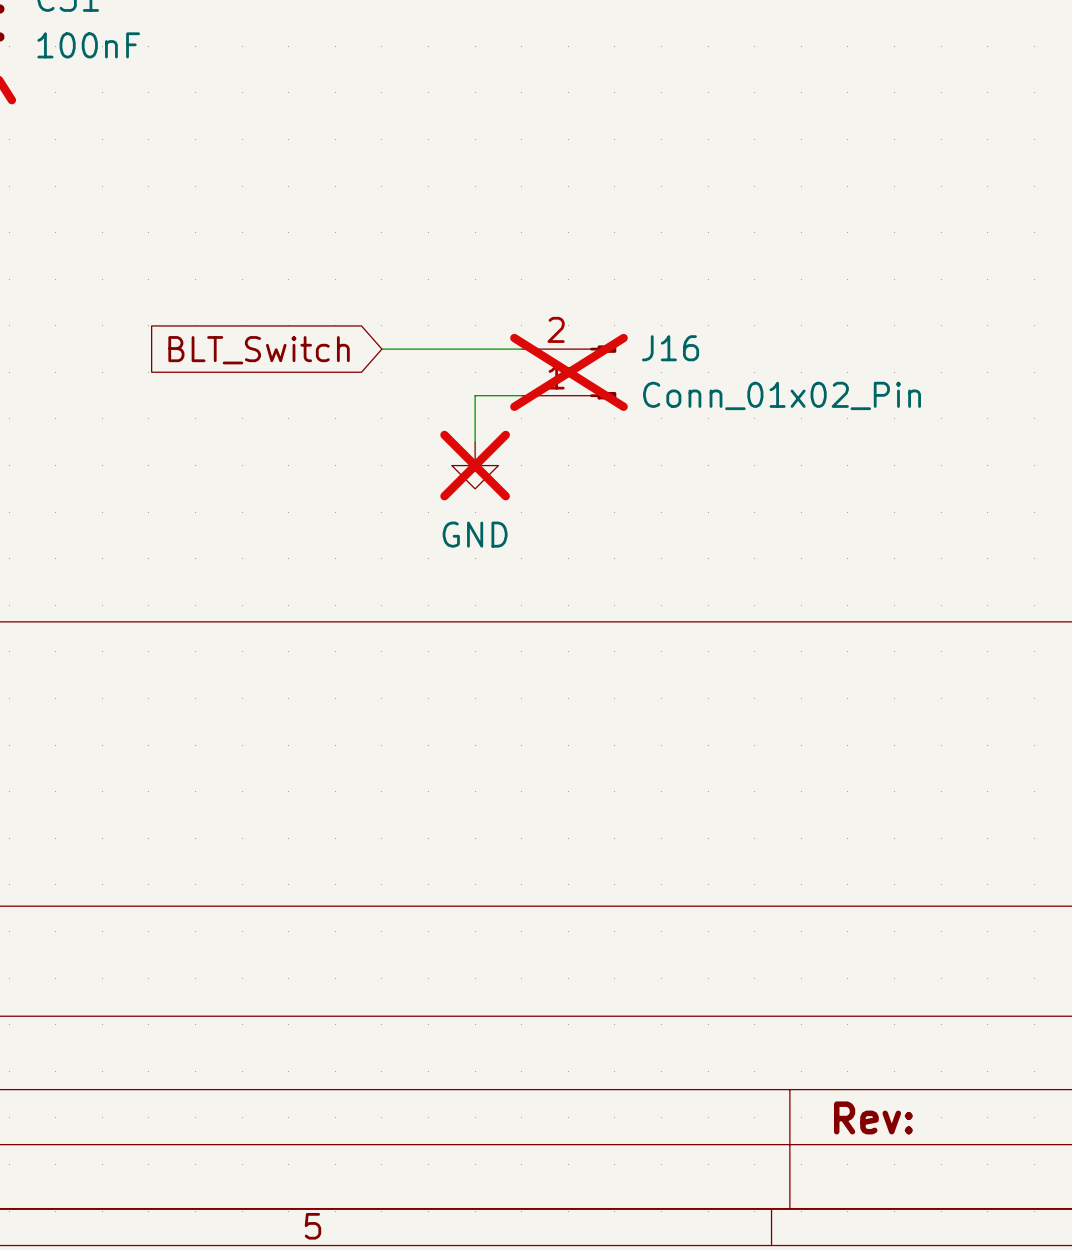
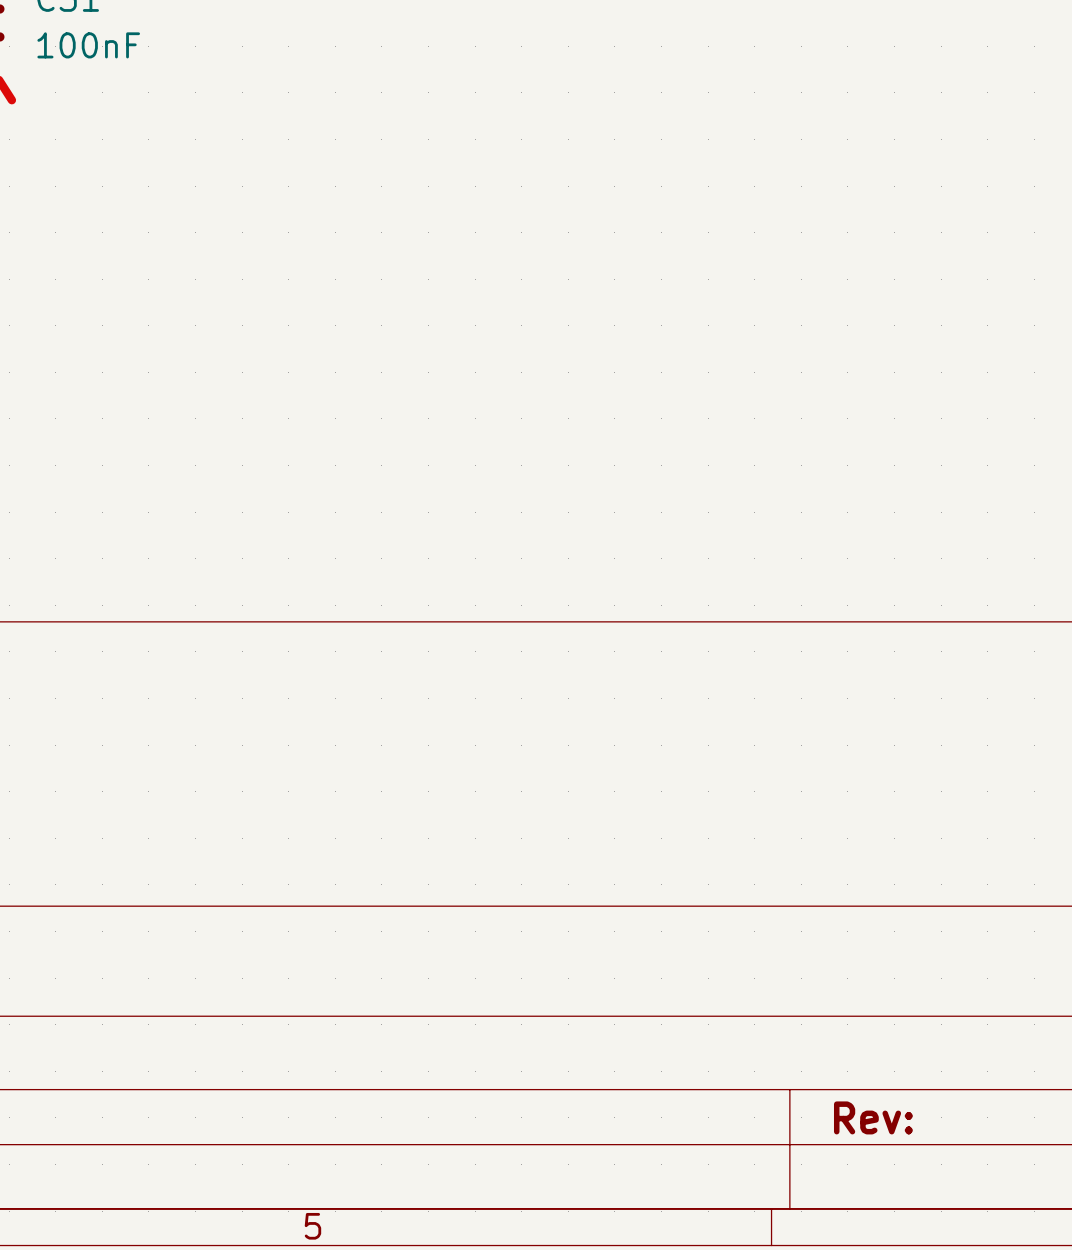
wire: (381, 349) (521, 349) -> none
global label: BLT_Switch (259, 350) -> none
J16: Conn_01x02_Pin (568, 372) -> none
wire: (521, 395) (475, 395) (475, 442) -> none
power symbol: GND (475, 465) -> none

